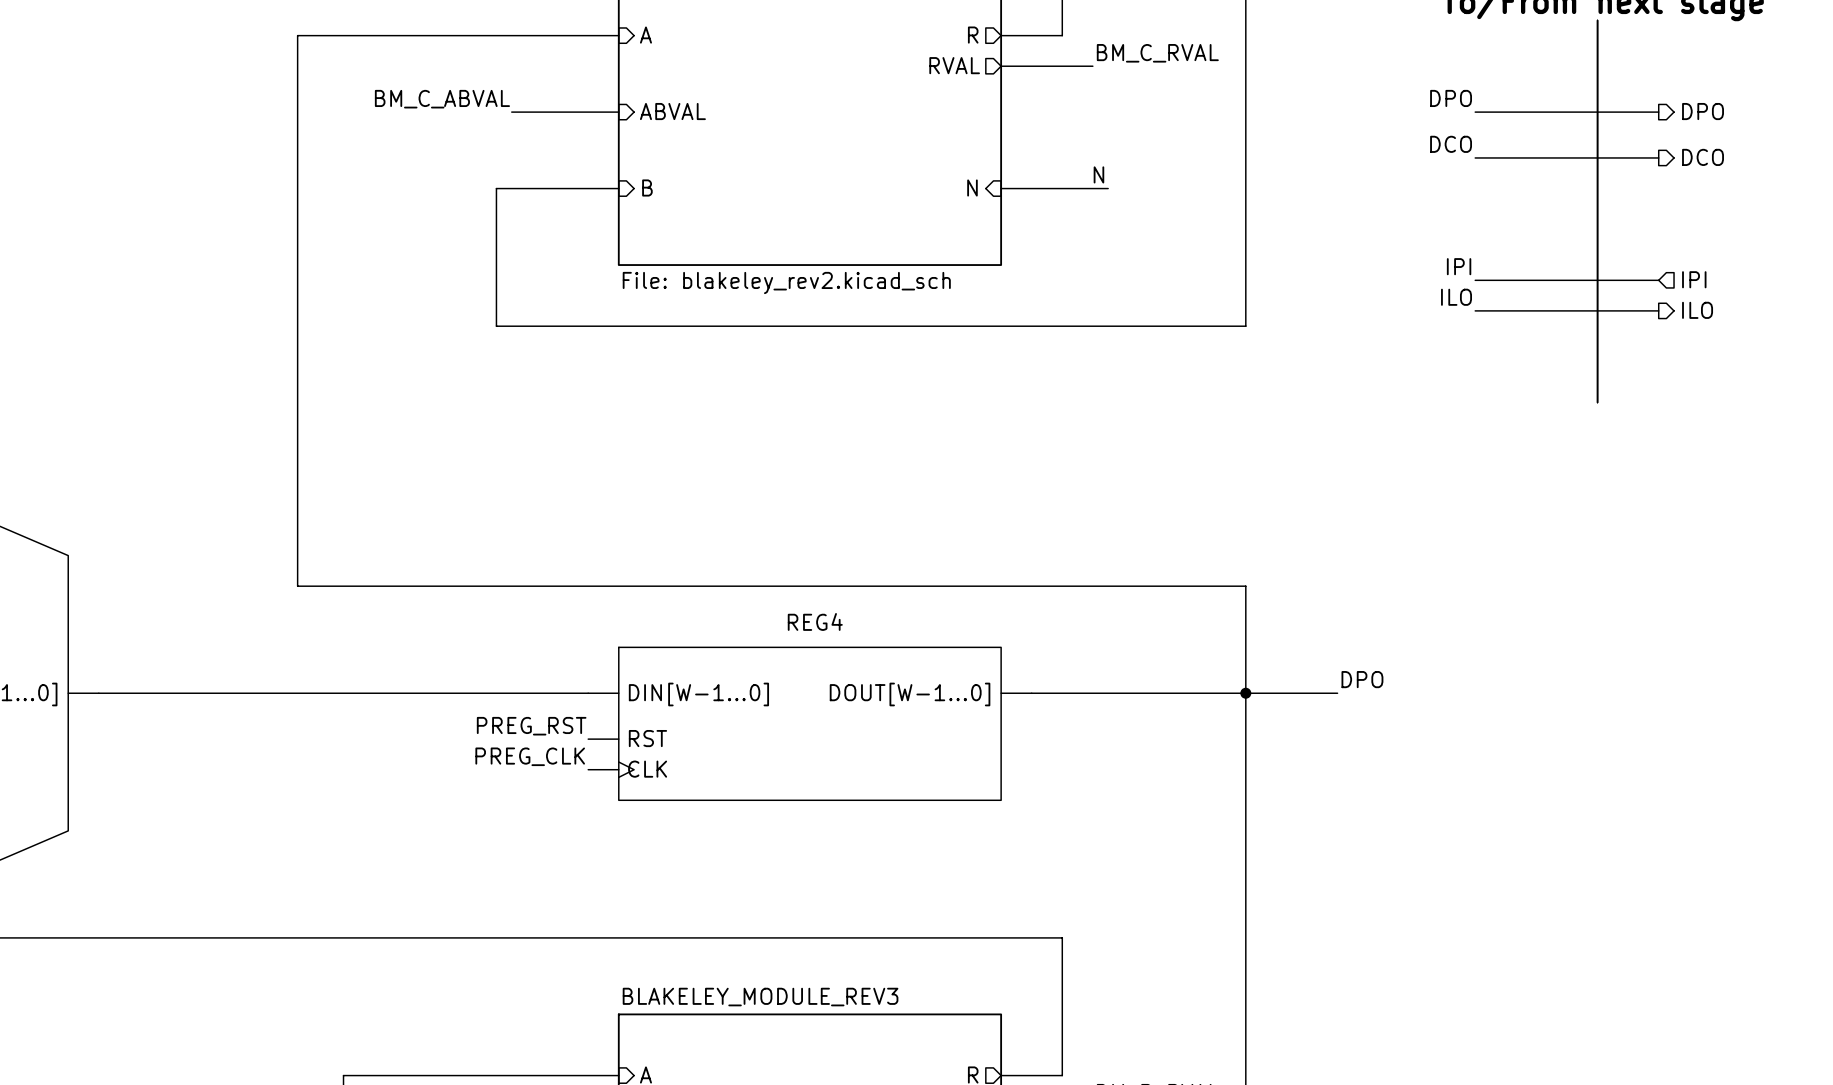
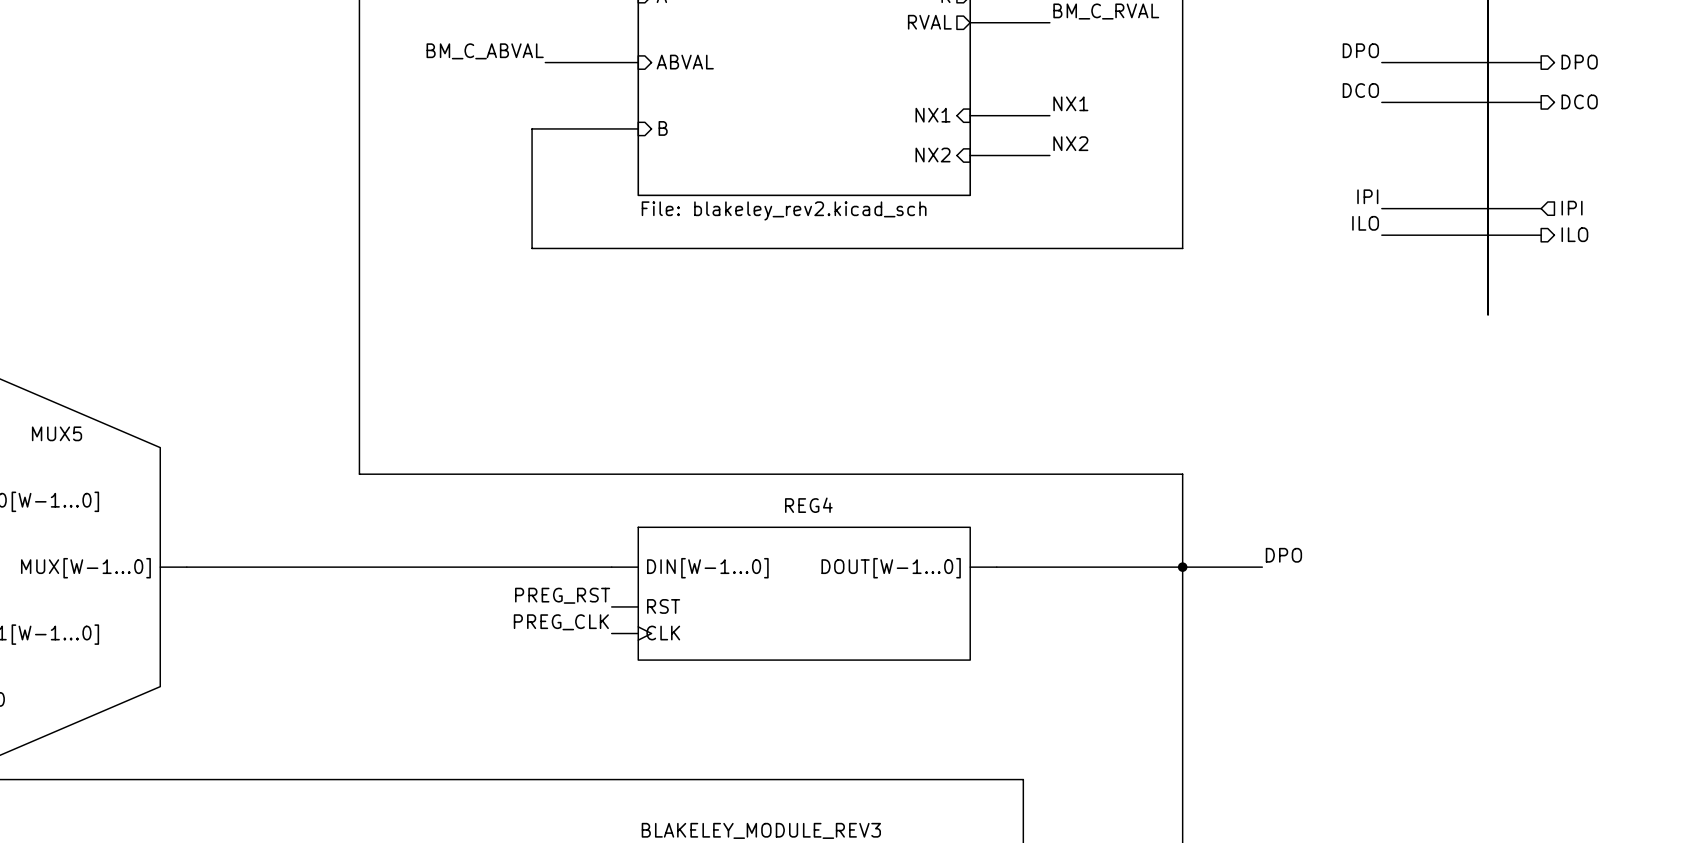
label: none -> NX1 (1070, 103)
sheet pin: none -> NX1 (933, 115)
wire: none -> (970, 115) (1049, 115)
label: N (1098, 174) -> none
sheet pin: N (972, 187) -> none
wire: (1001, 188) (1108, 188) -> none
label: none -> NX2 (1070, 143)
sheet pin: none -> NX2 (933, 155)
wire: none -> (970, 155) (1049, 155)

